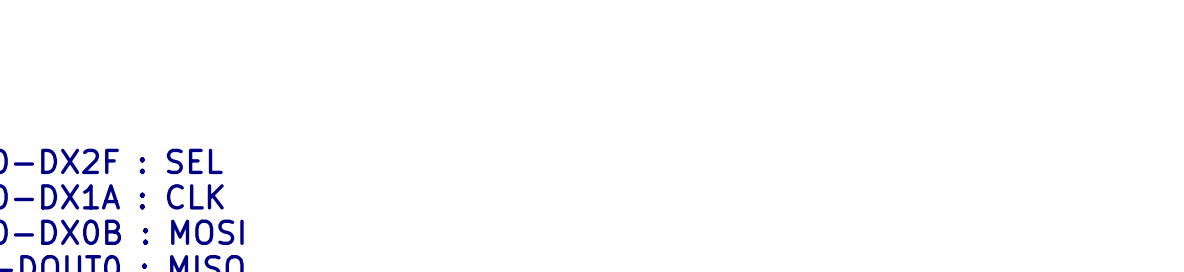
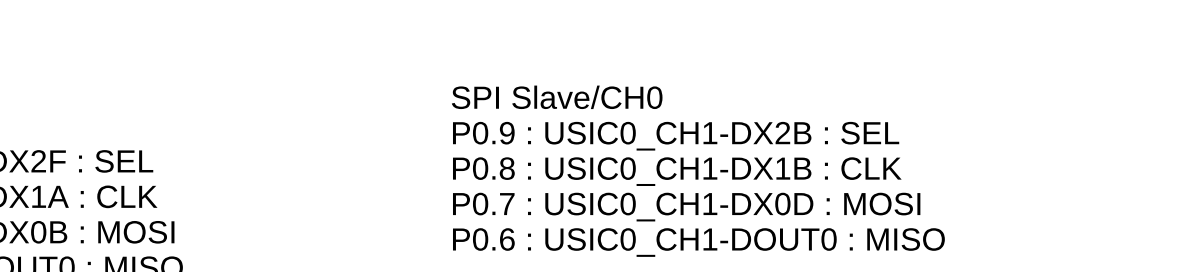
text: none -> SPI Slave/CH0 (557, 97)
text: none -> P0.9 : USIC0_CH1-DX2B : SEL (676, 136)
text: none -> P0.8 : USIC0_CH1-DX1B : CLK (677, 171)
text: none -> P0.7 : USIC0_CH1-DX0D : MOSI (686, 207)
text: none -> P0.6 : USIC0_CH1-DOUT0 : MISO (698, 242)

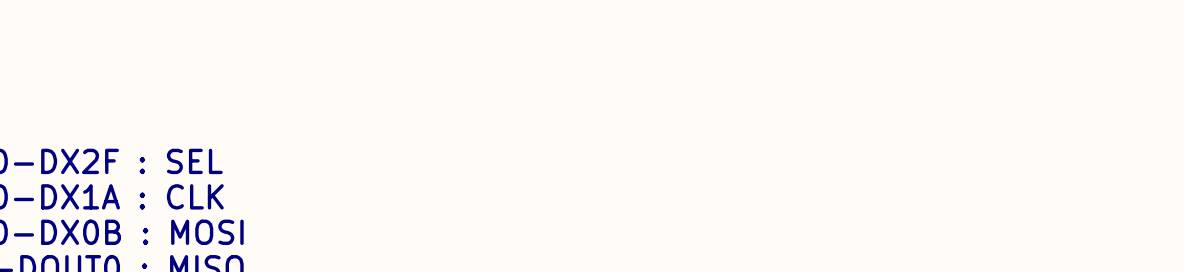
text: SPI Slave/CH0 (557, 97) -> none
text: P0.9 : USIC0_CH1-DX2B : SEL (676, 136) -> none
text: P0.8 : USIC0_CH1-DX1B : CLK (677, 171) -> none
text: P0.7 : USIC0_CH1-DX0D : MOSI (686, 207) -> none
text: P0.6 : USIC0_CH1-DOUT0 : MISO (698, 242) -> none

